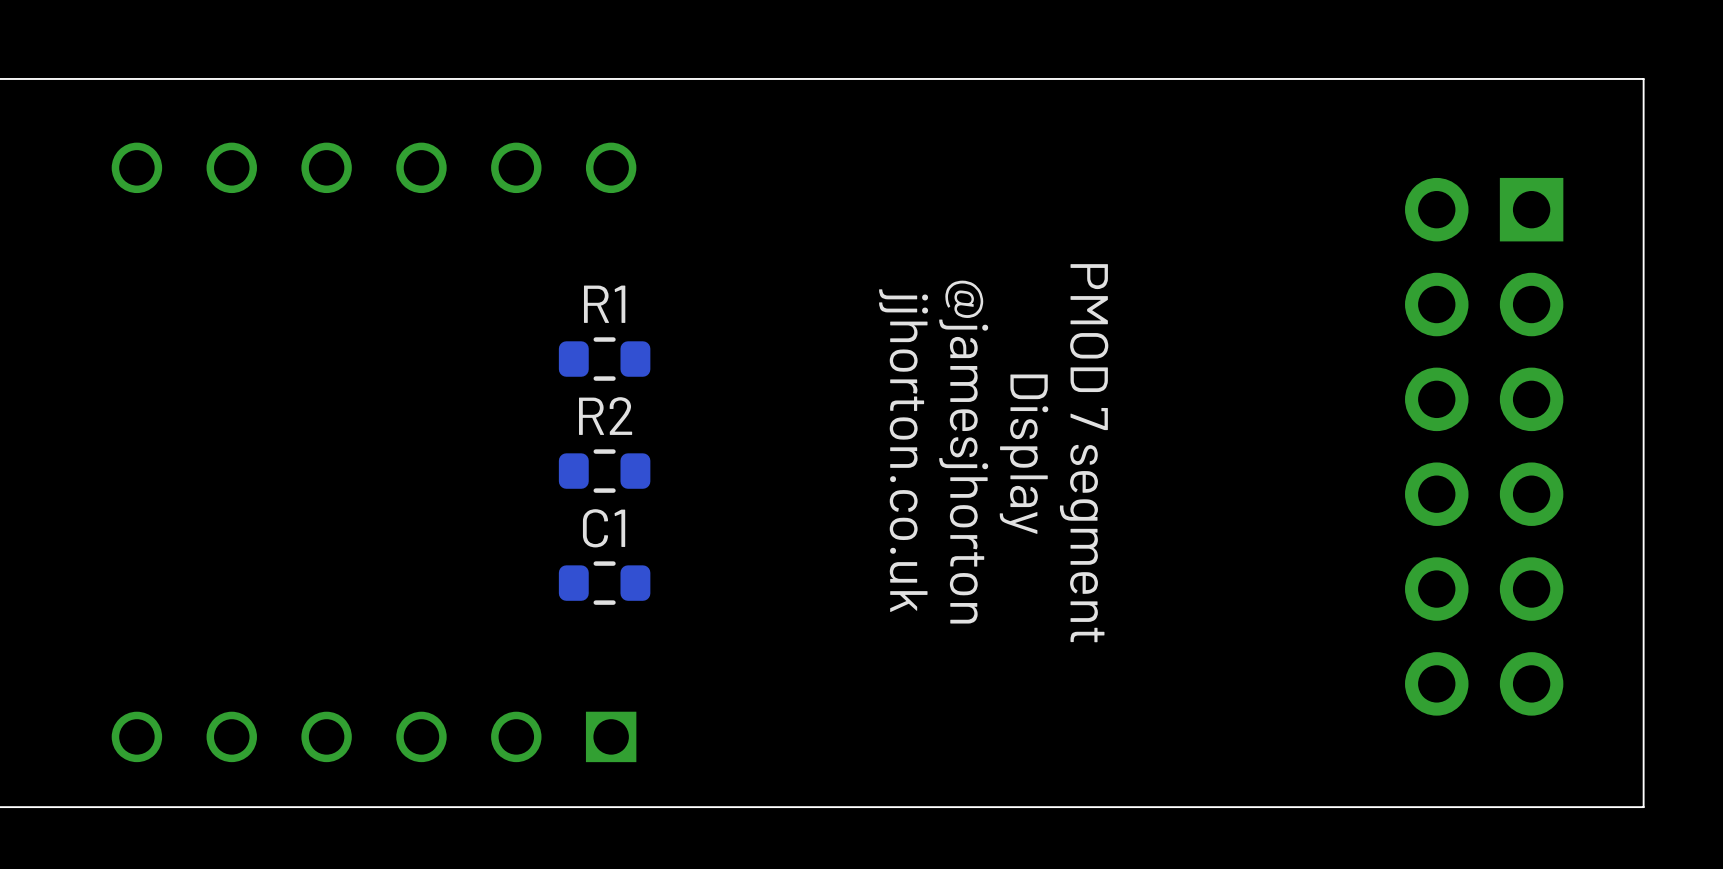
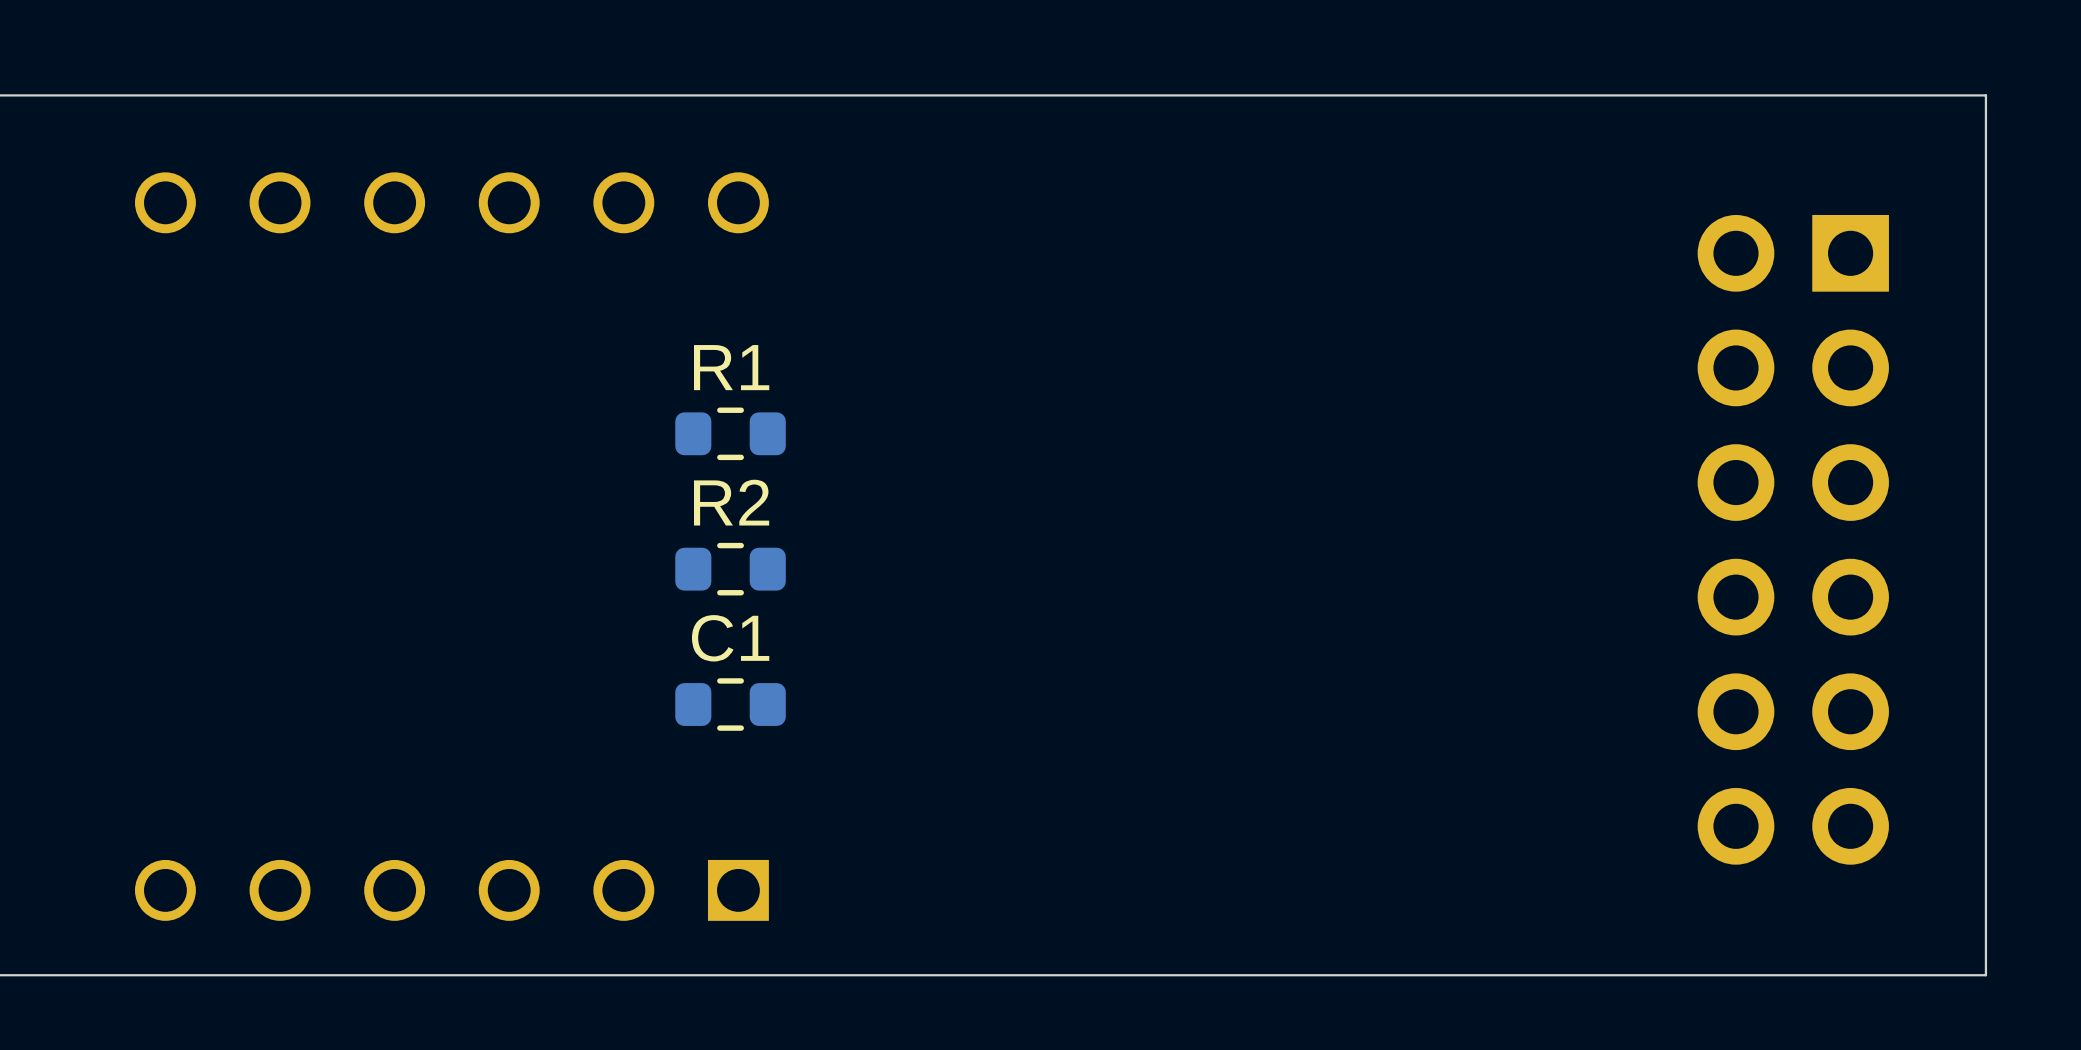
text: jjhorton.co.uk (903, 450) -> none
text: @jamesjhorton (963, 452) -> none
text: PMOD 7 segment (1084, 453) -> none
text: Display (1024, 454) -> none

